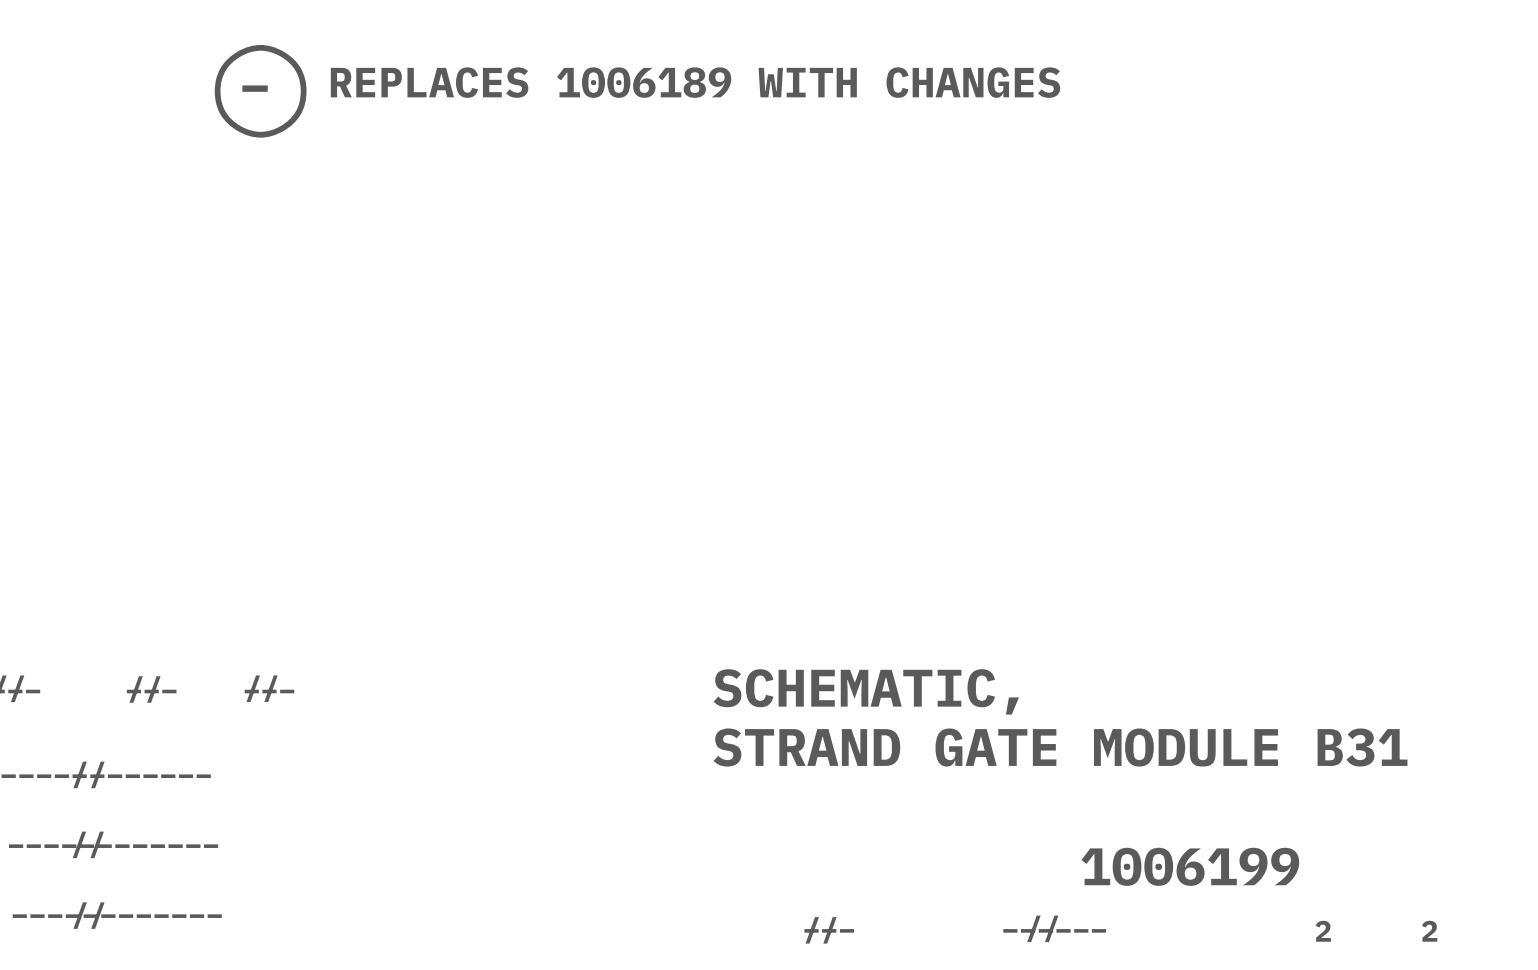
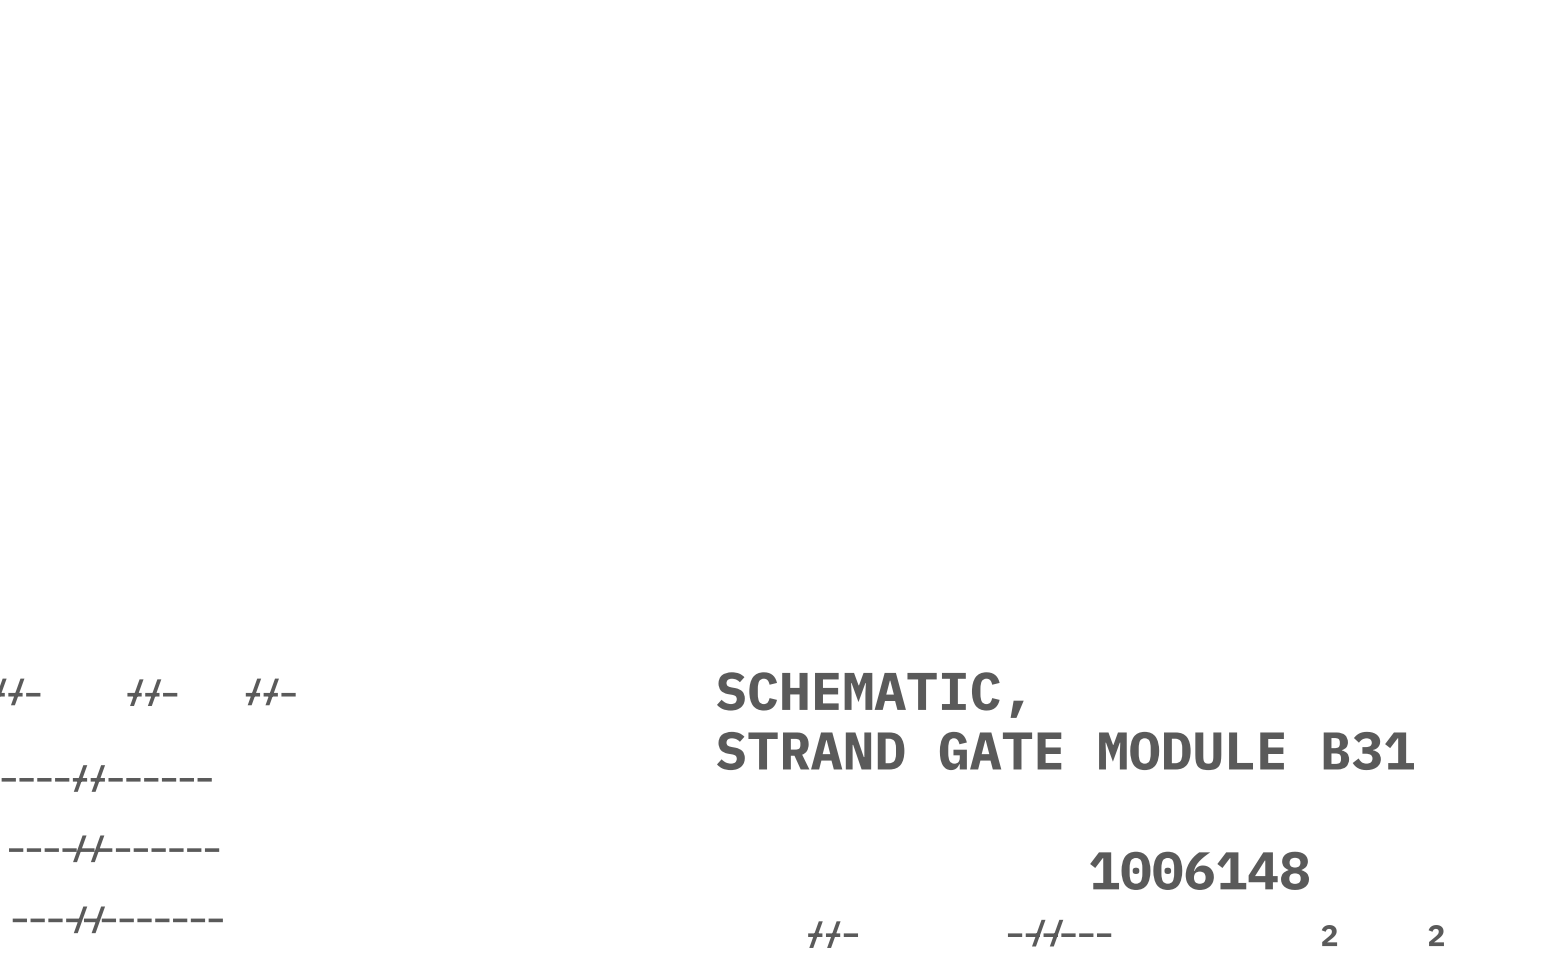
text: REPLACES 1006189 WITH CHANGES (695, 82) -> none
text: _ (255, 88) -> none
text: ◯ (260, 91) -> none
text: 1006199 (1190, 866) -> 1006148 (1199, 870)

